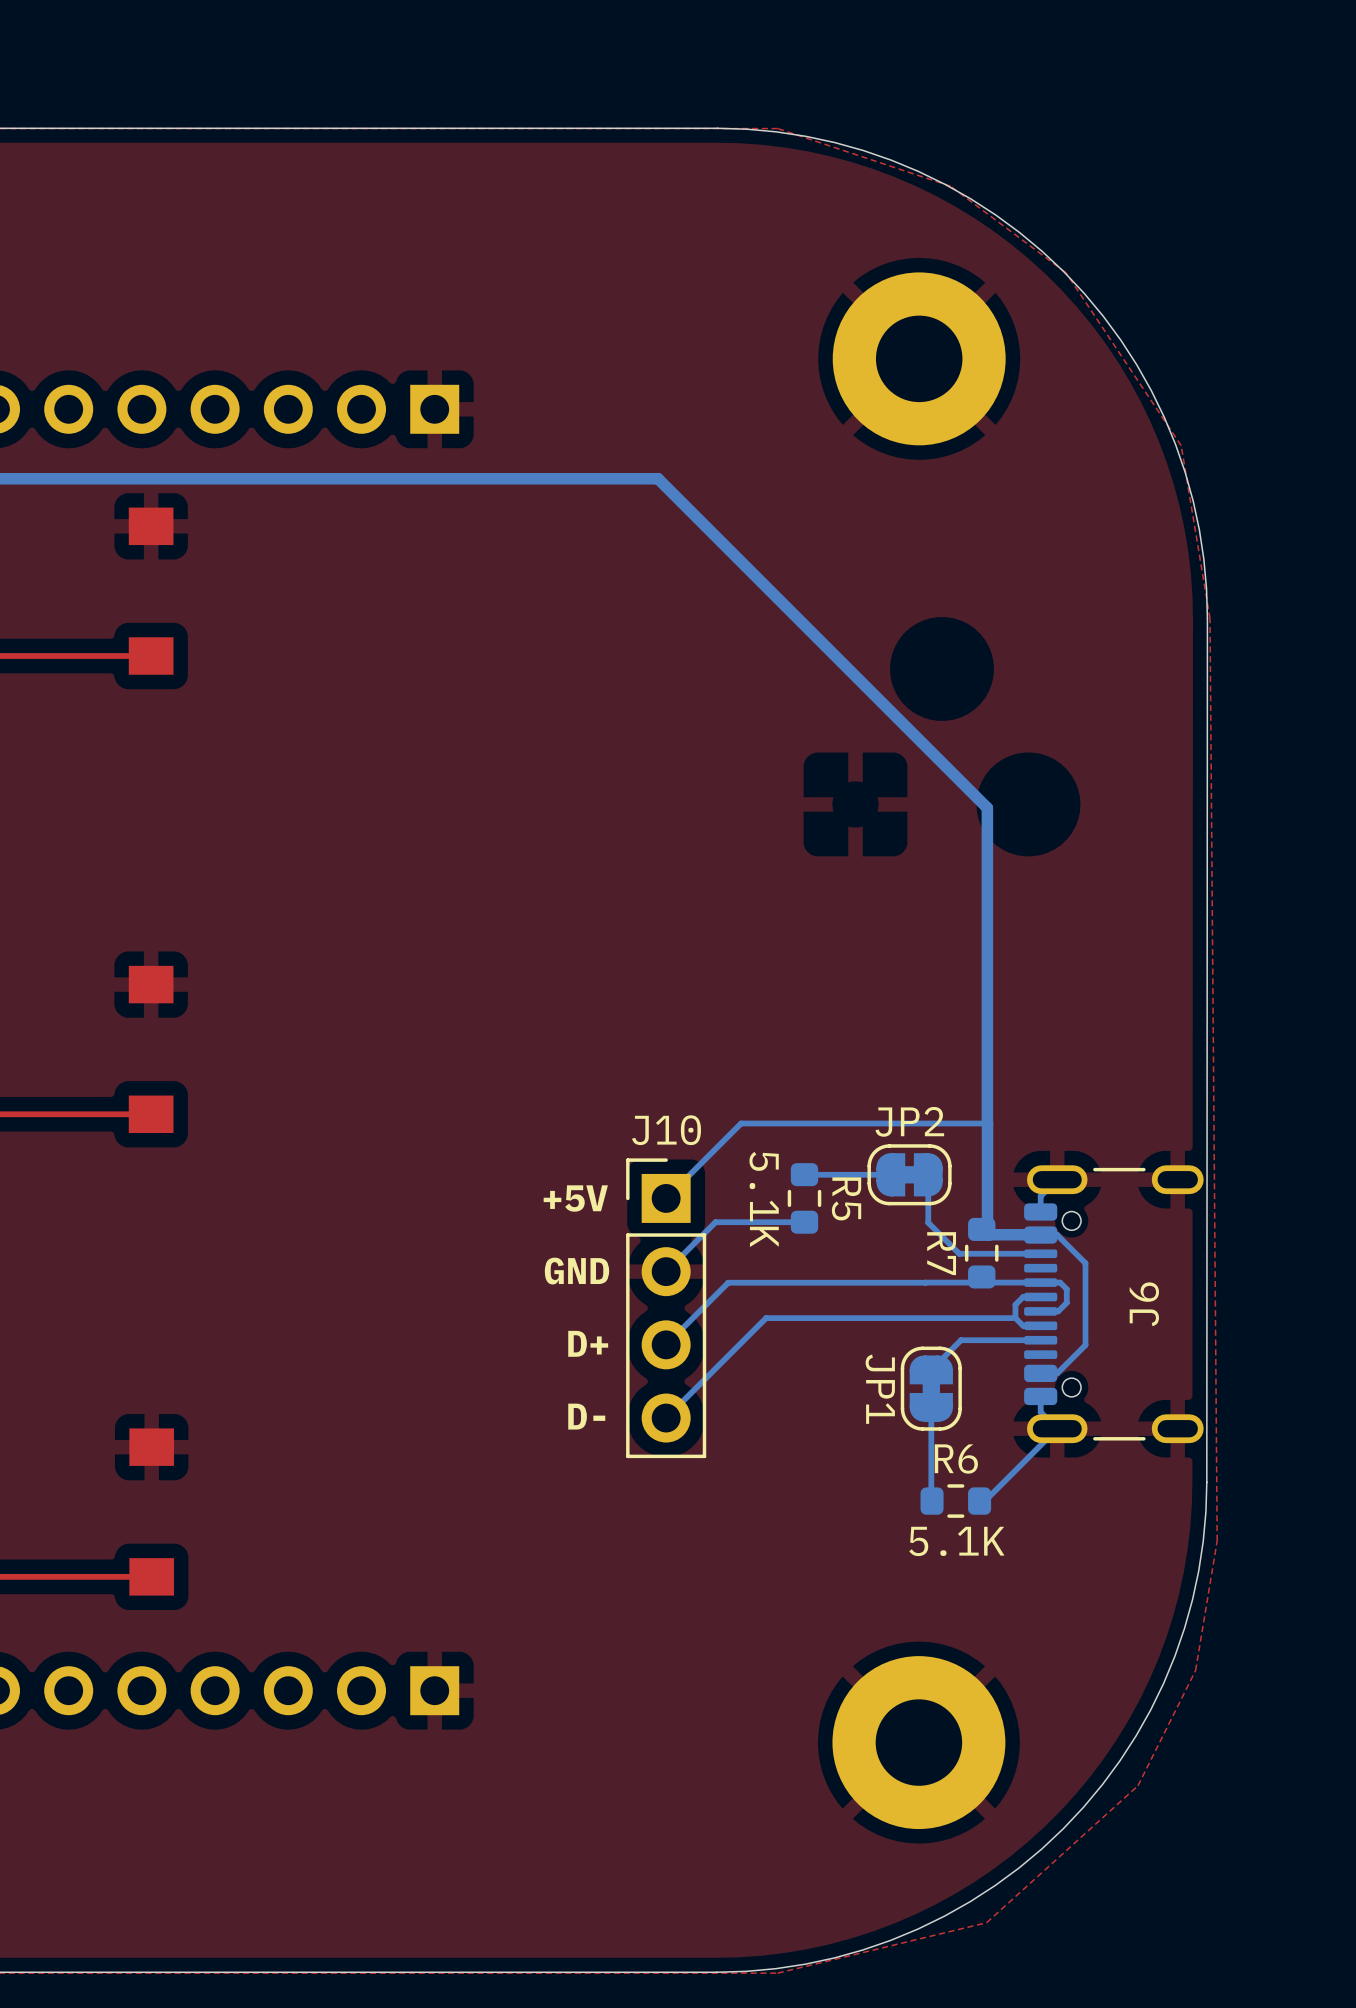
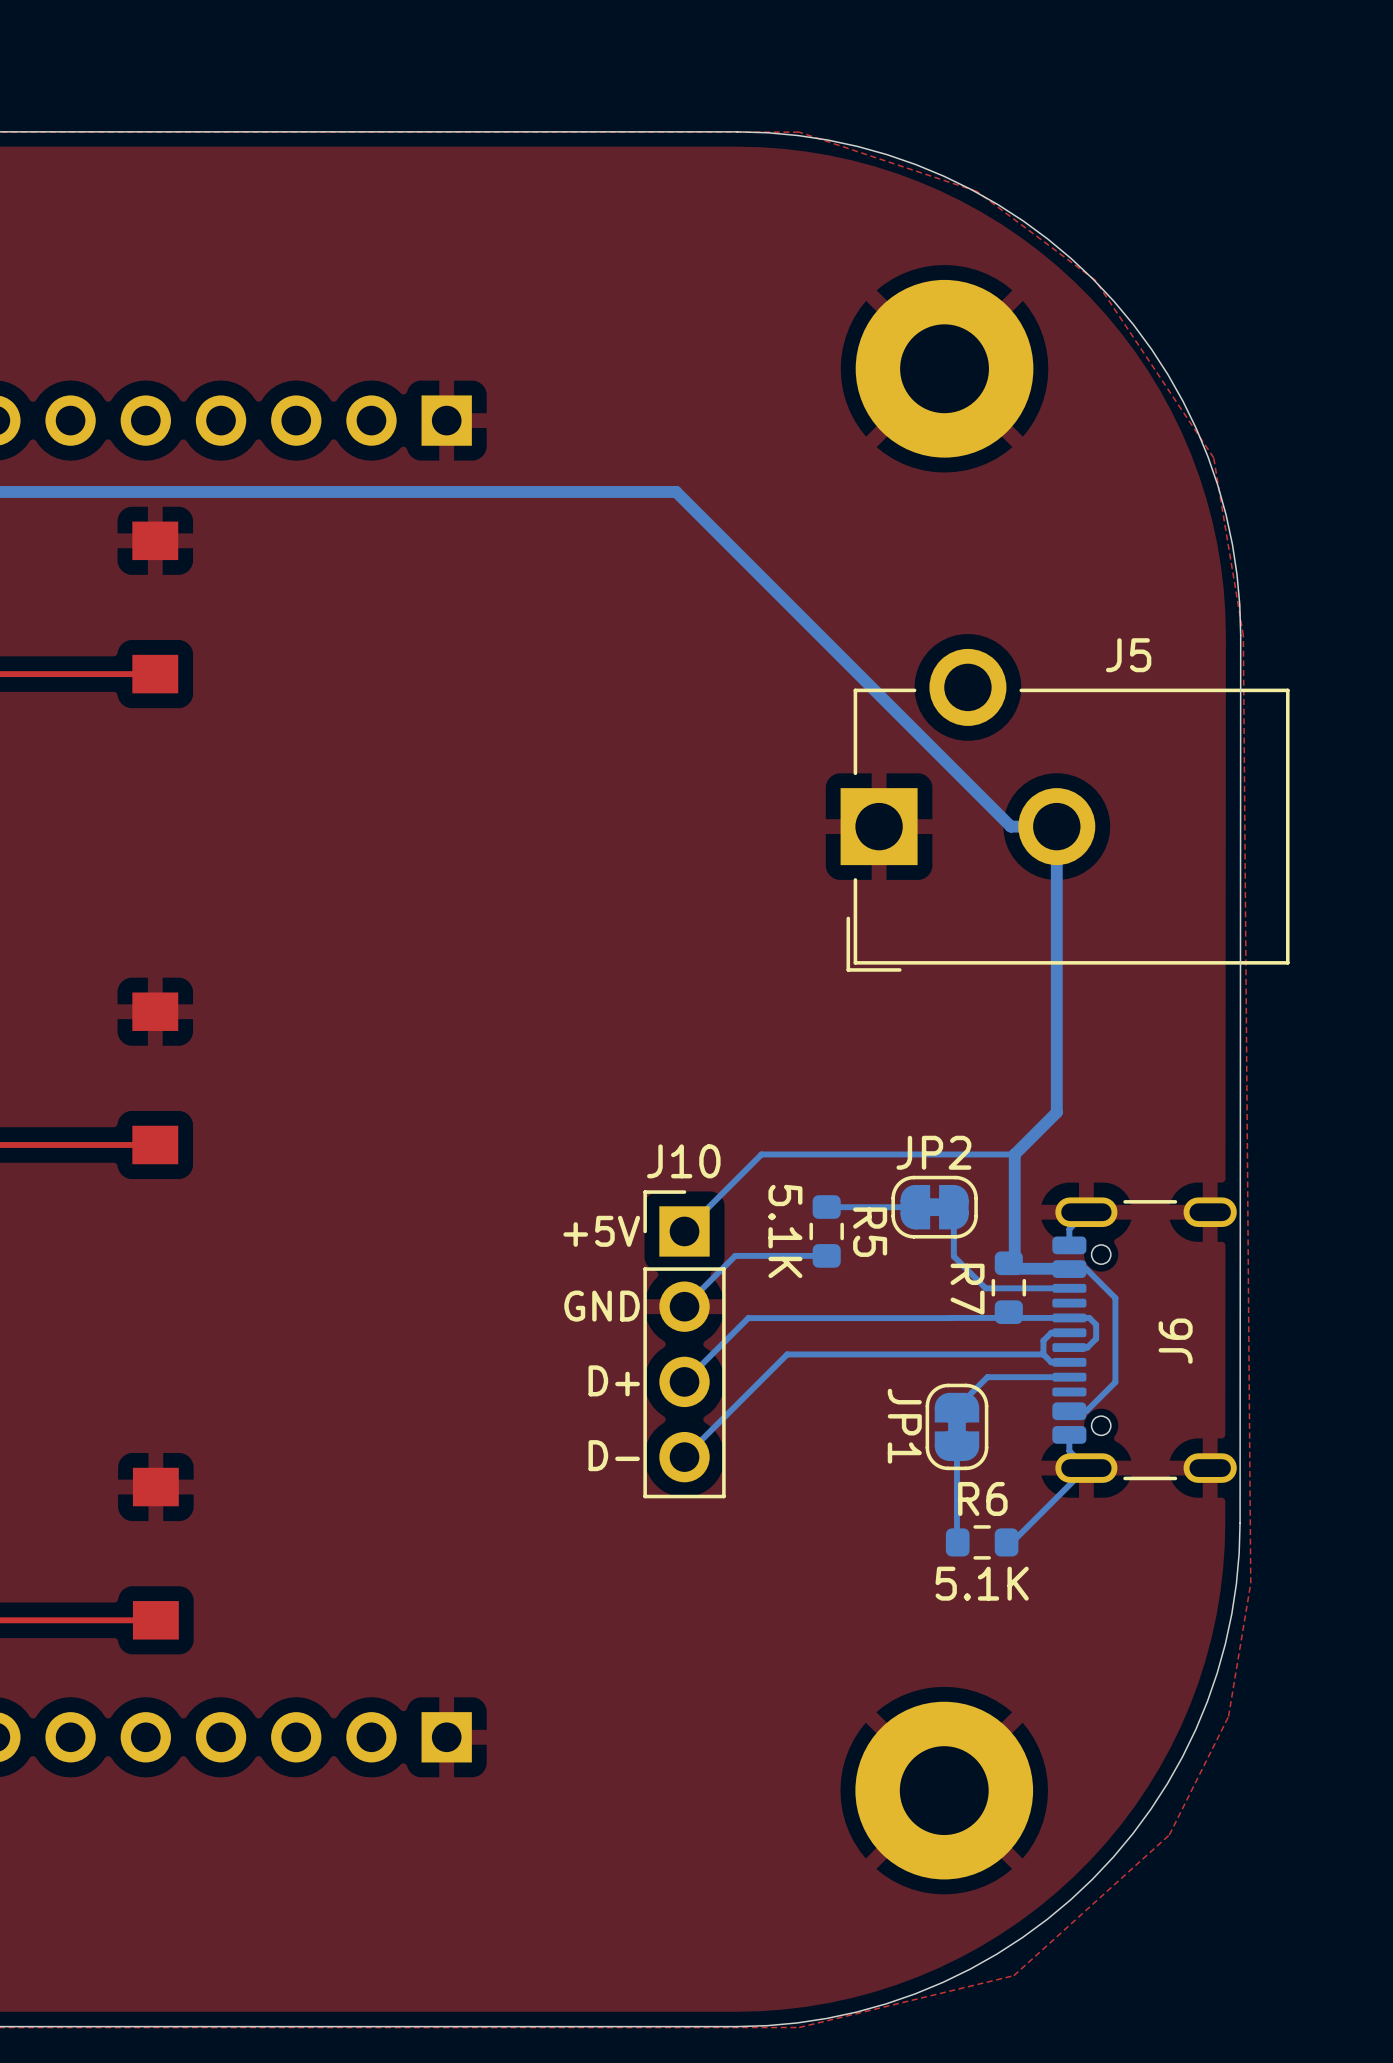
J5: none -> (1065, 810)
bottom track: (983, 804) (987, 808) (987, 1123) -> (1010, 826) (1056, 826) (1056, 1112) (1014, 1154)

